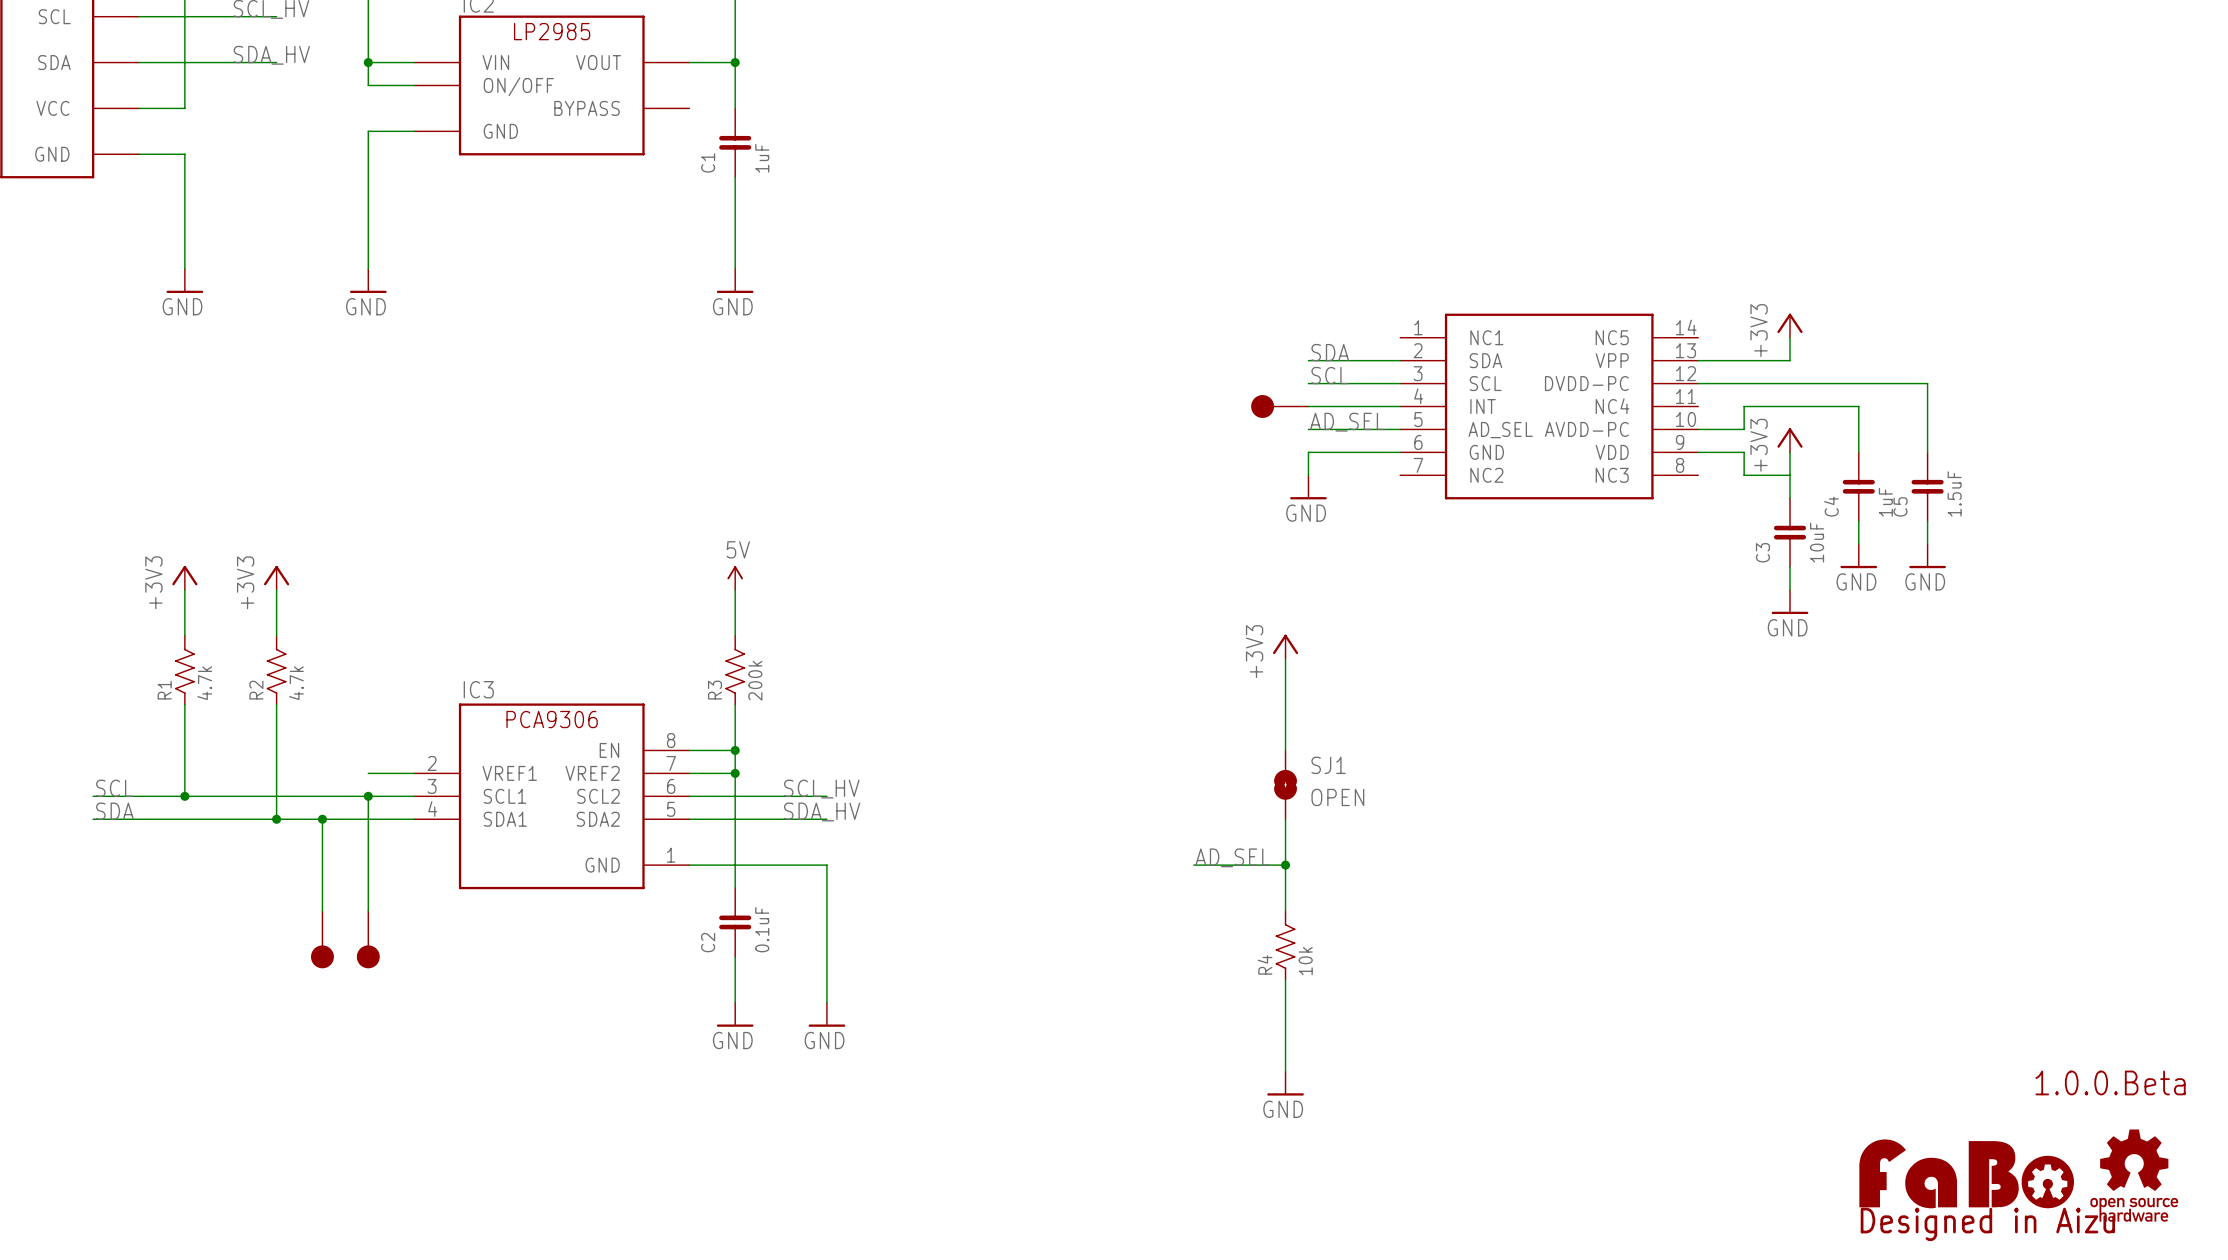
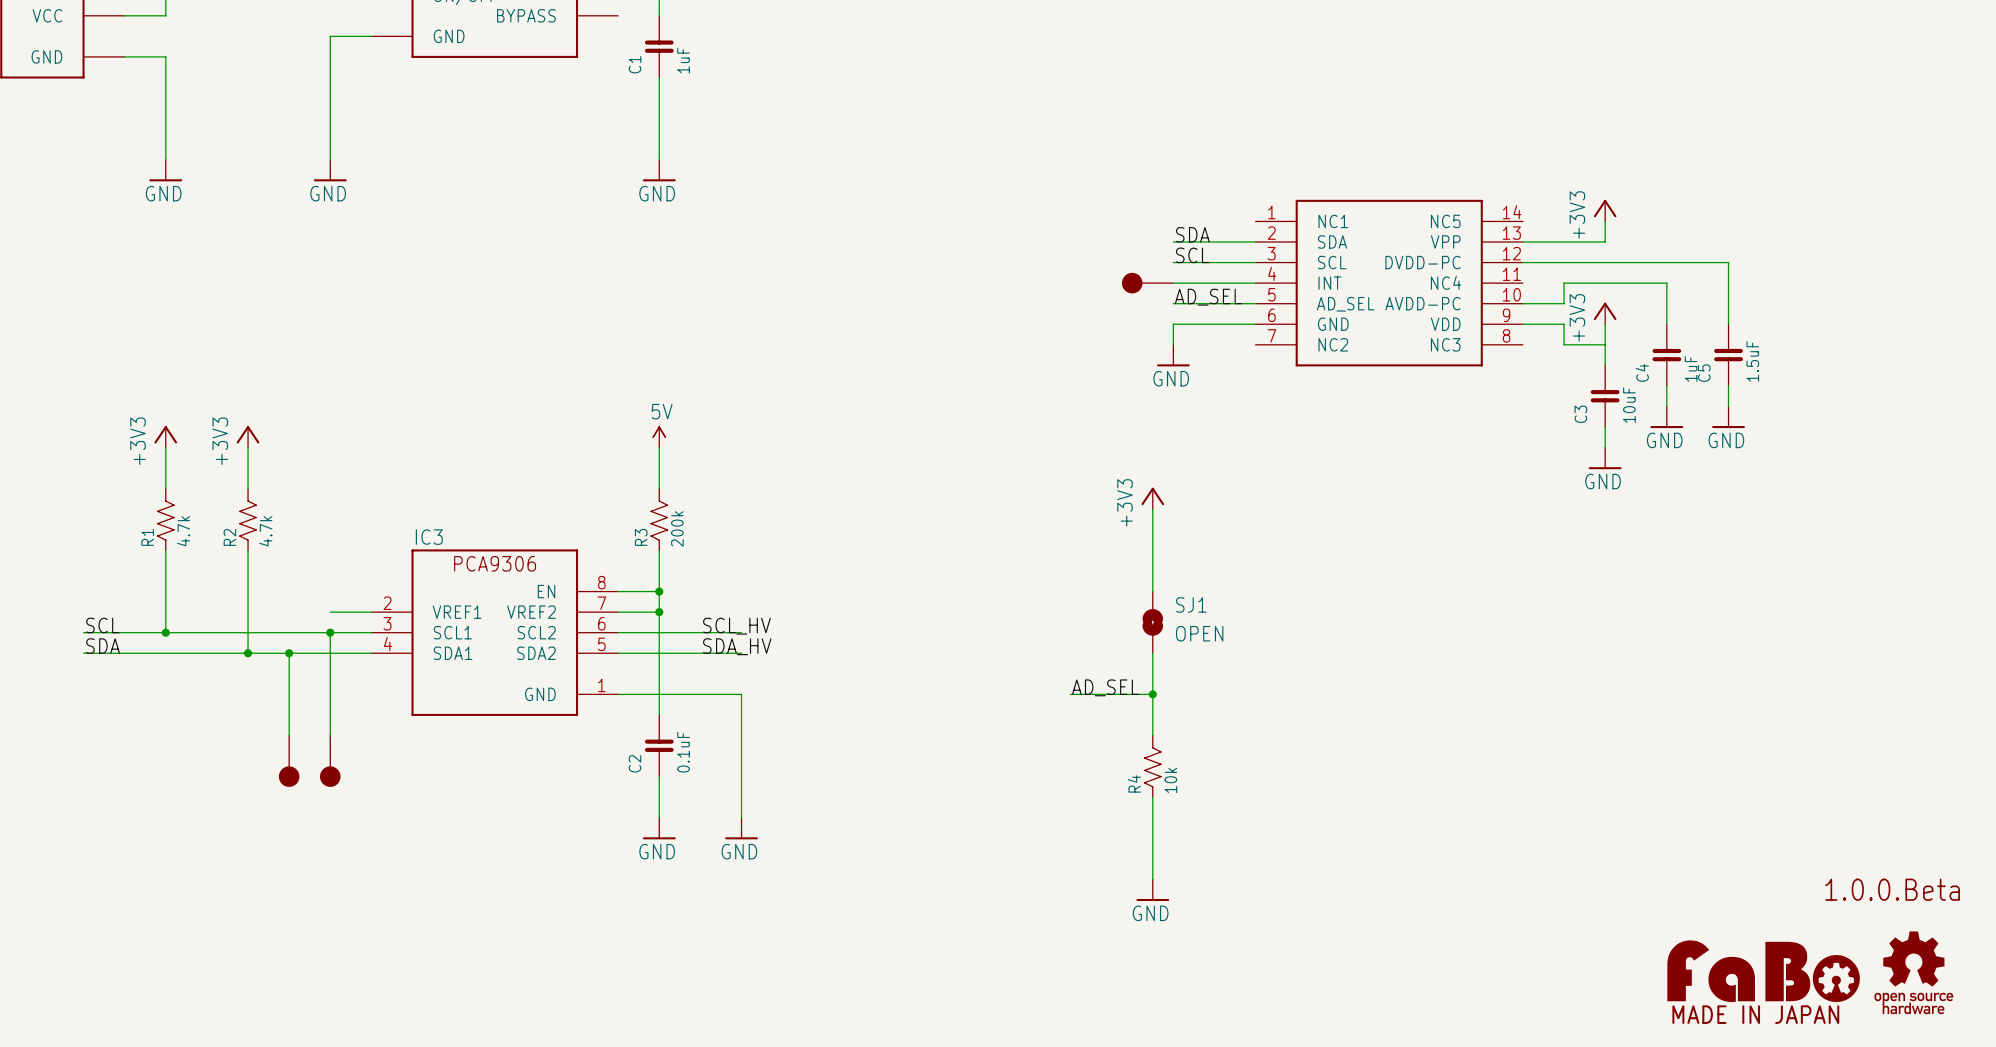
part text: none -> MADE IN JAPAN (1755, 1014)
part text: Designed in Aizu (1987, 1224) -> none

